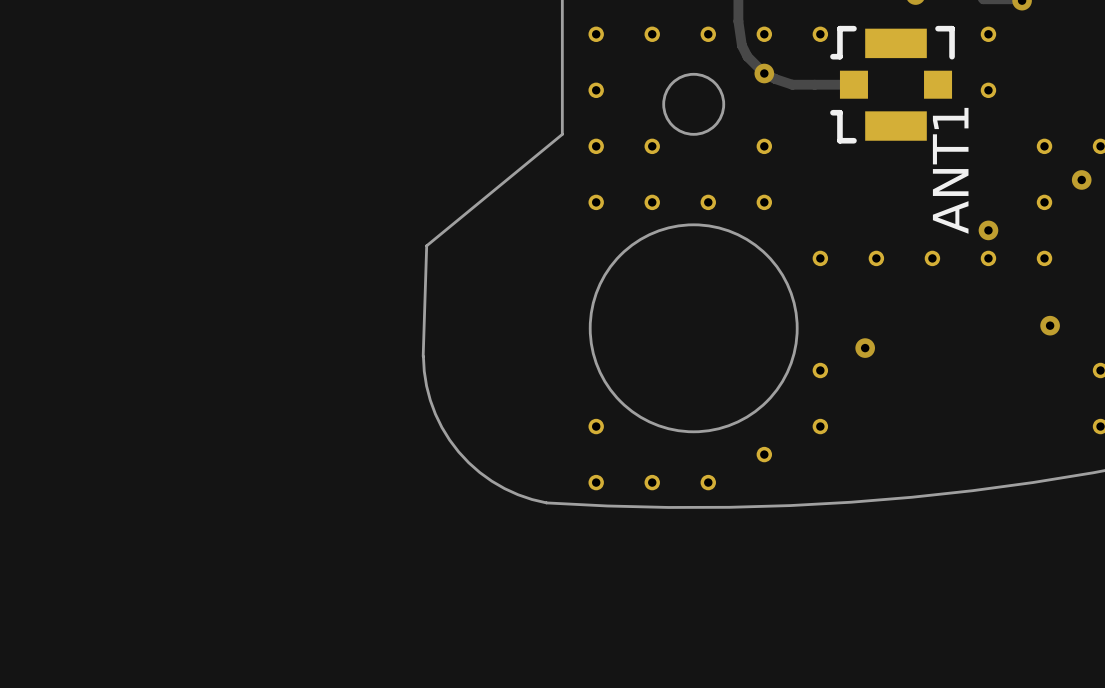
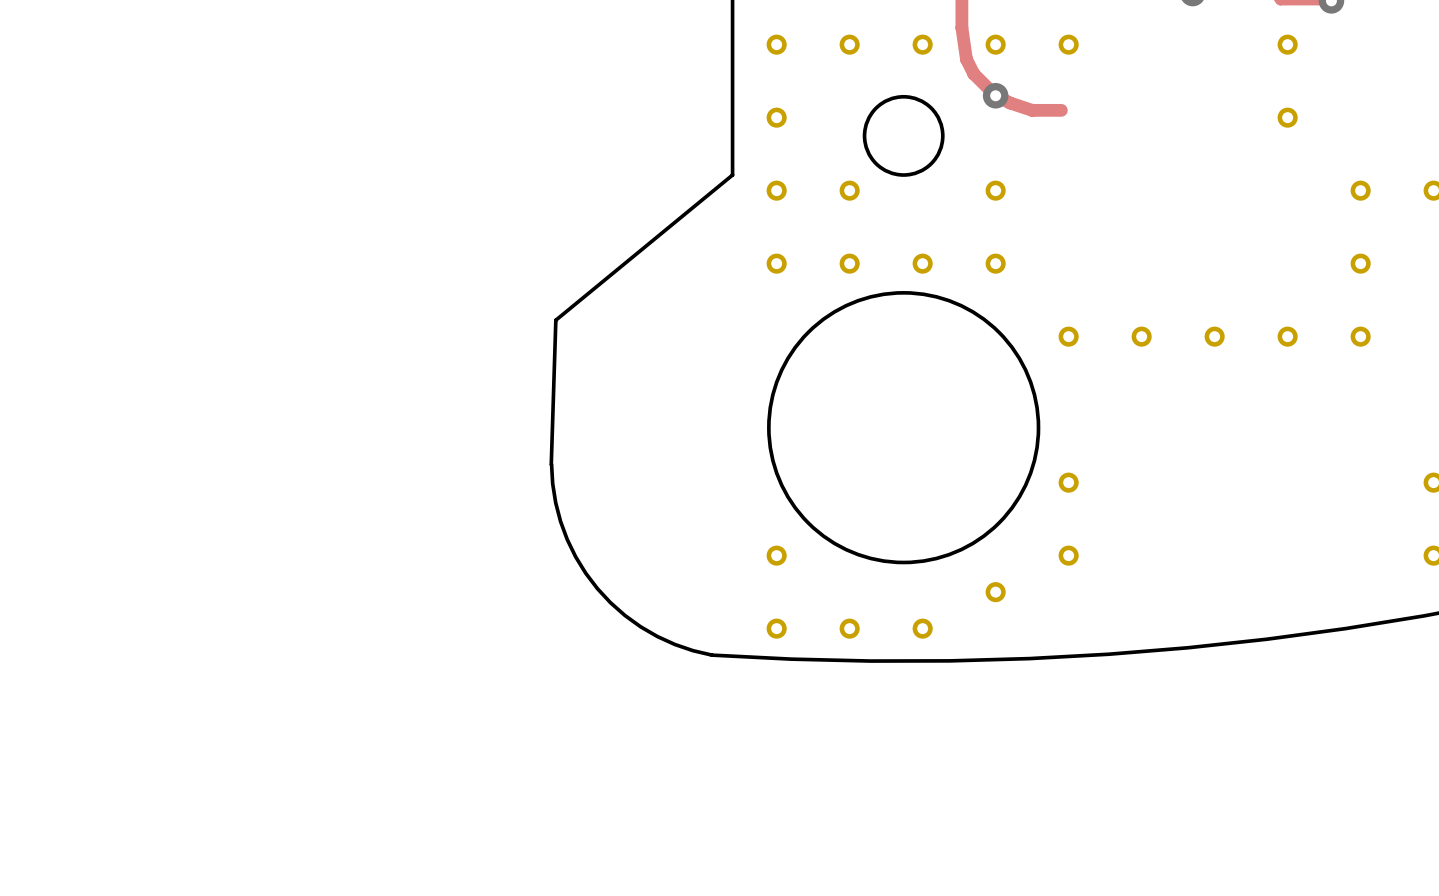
track: (814, 84) (853, 84) -> none
ANT1: (892, 84) -> none
via: (1081, 179) -> none
via: (988, 230) -> none
via: (1050, 325) -> none
via: (865, 348) -> none

